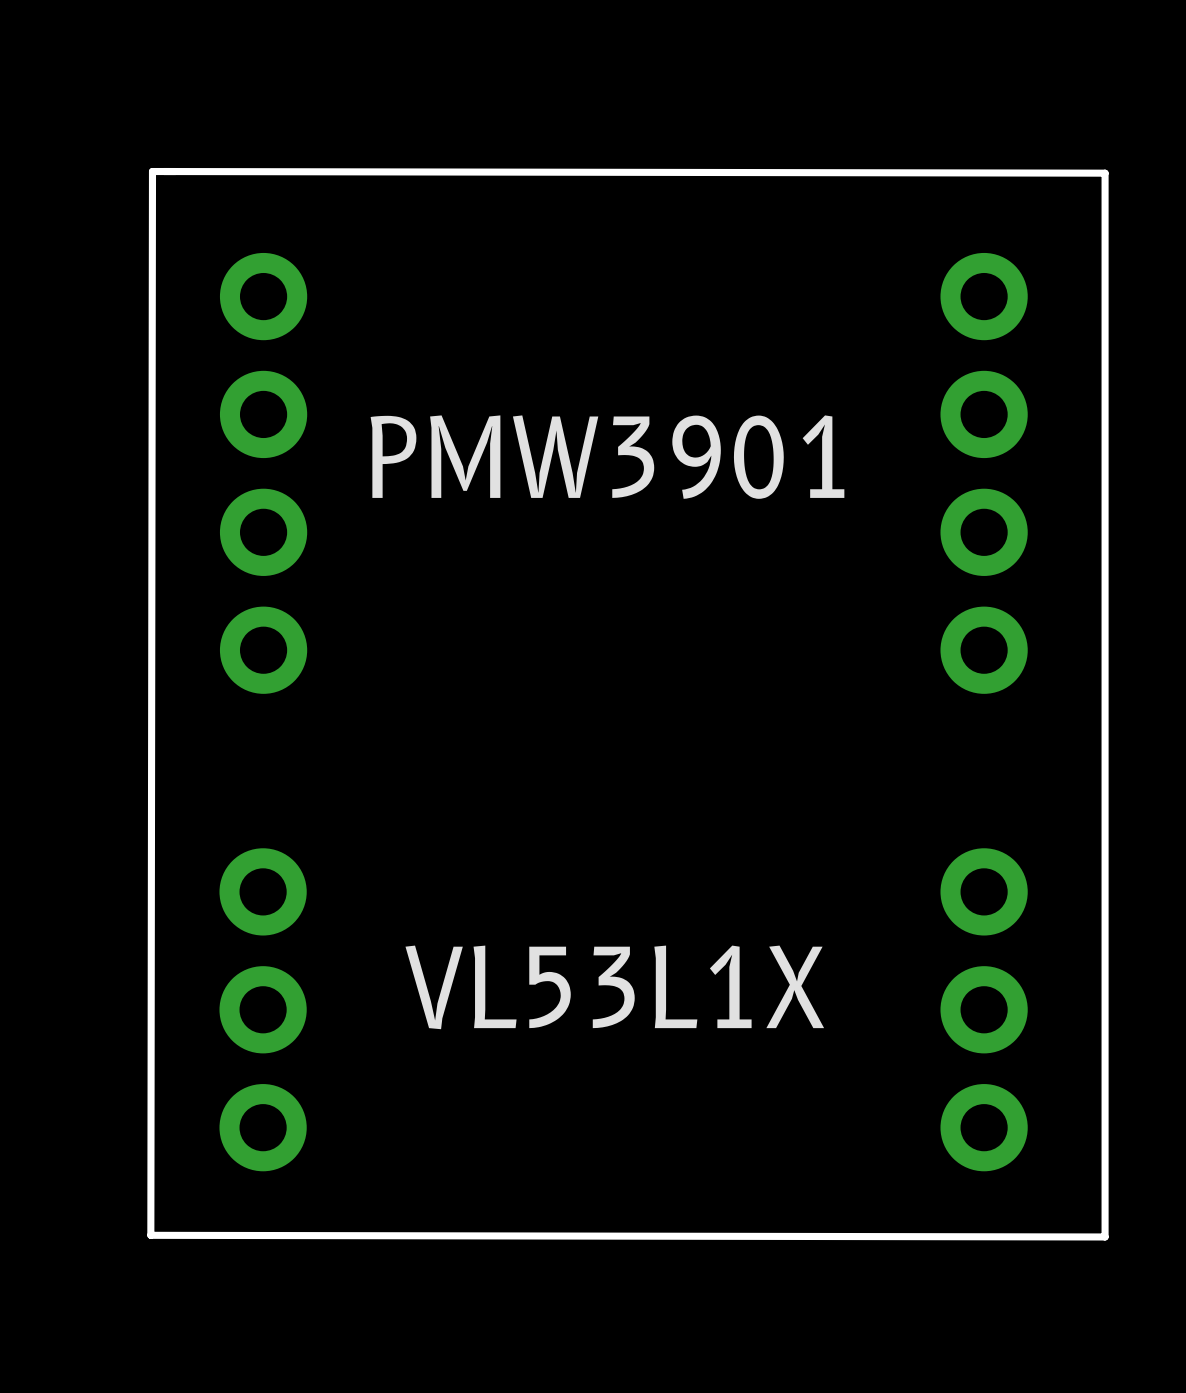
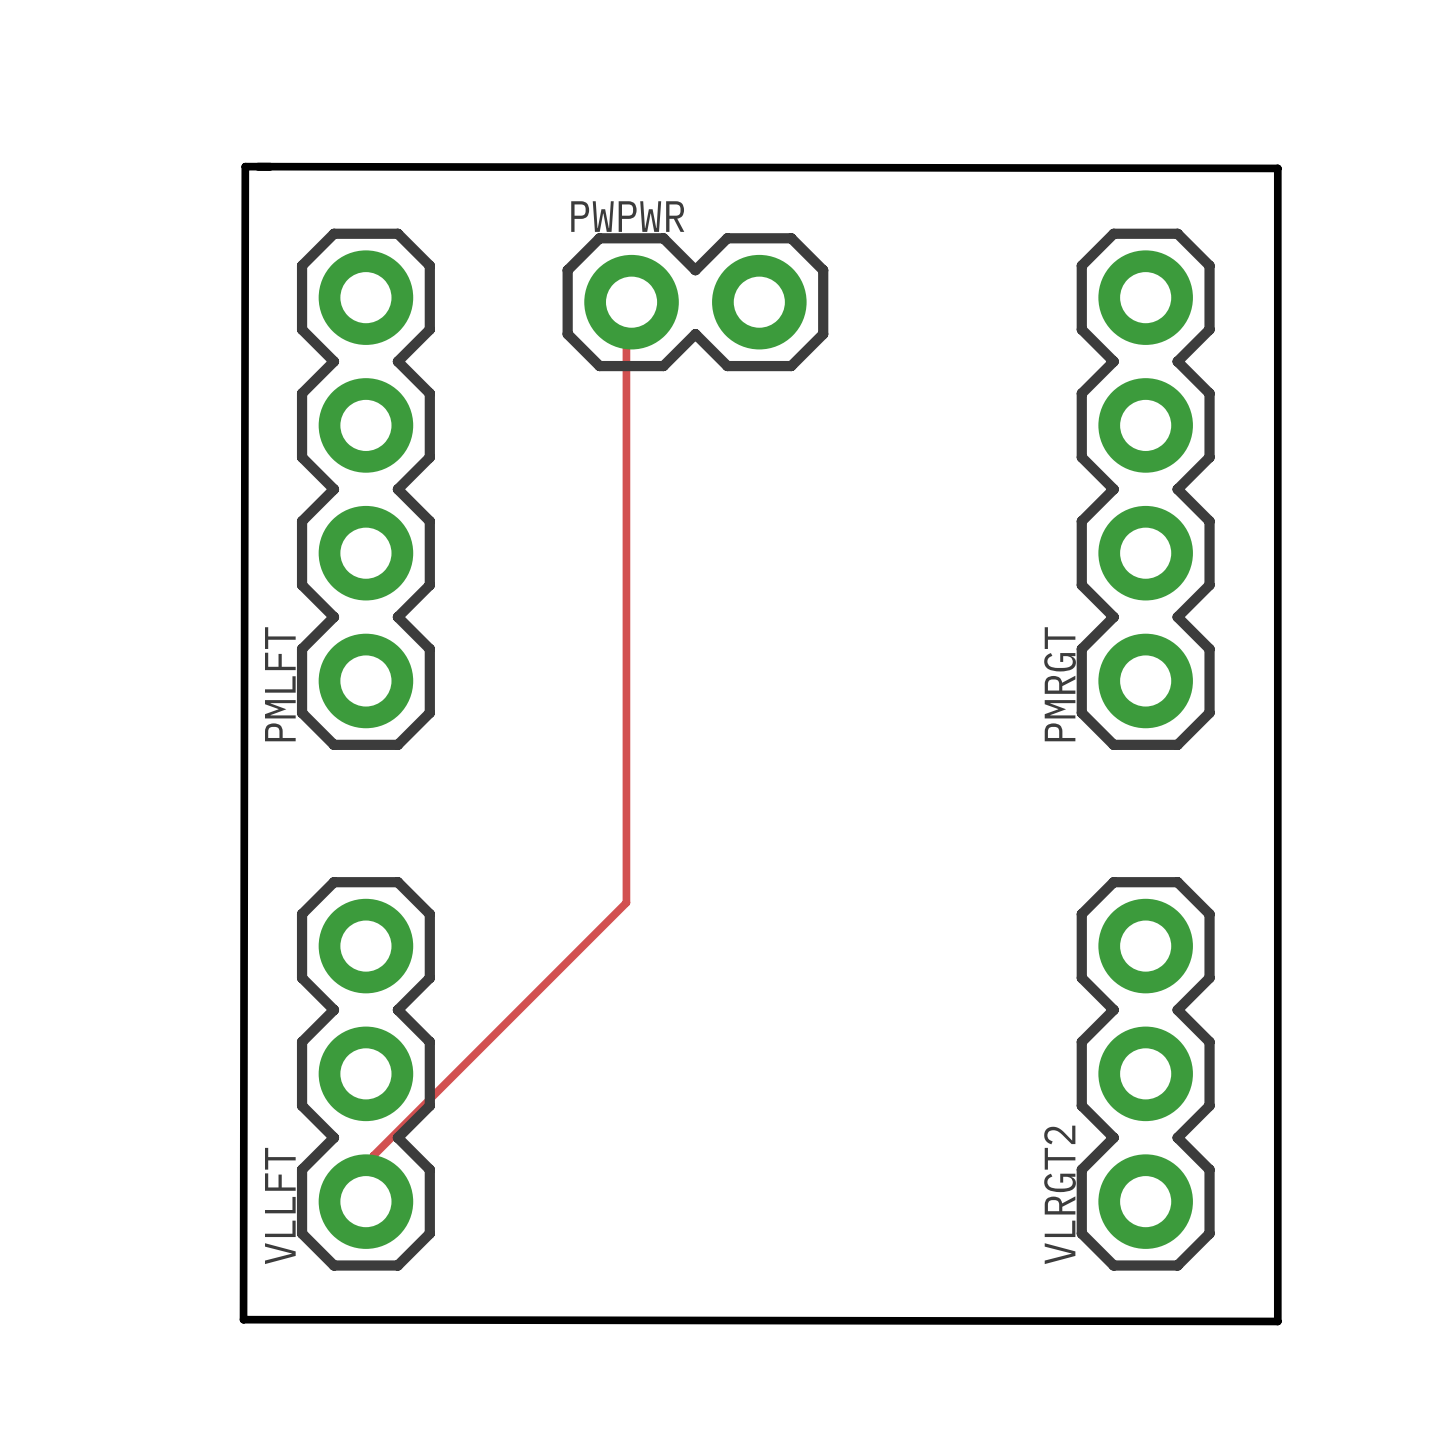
track: none -> (631, 302) (626, 304) (626, 902) (373, 1155) (373, 1194) (365, 1204)
PWPWR: none -> (695, 302)
text: PMW3901 (607, 457) -> none
PMLFT: none -> (365, 489)
PMRGT: none -> (1145, 489)
part: (263, 473) -> none
part: (984, 473) -> none
text: VL53L1X (614, 987) -> none
VLLFT: none -> (365, 1073)
VLRGT2: none -> (1145, 1073)
part: (263, 1009) -> none
part: (984, 1009) -> none

